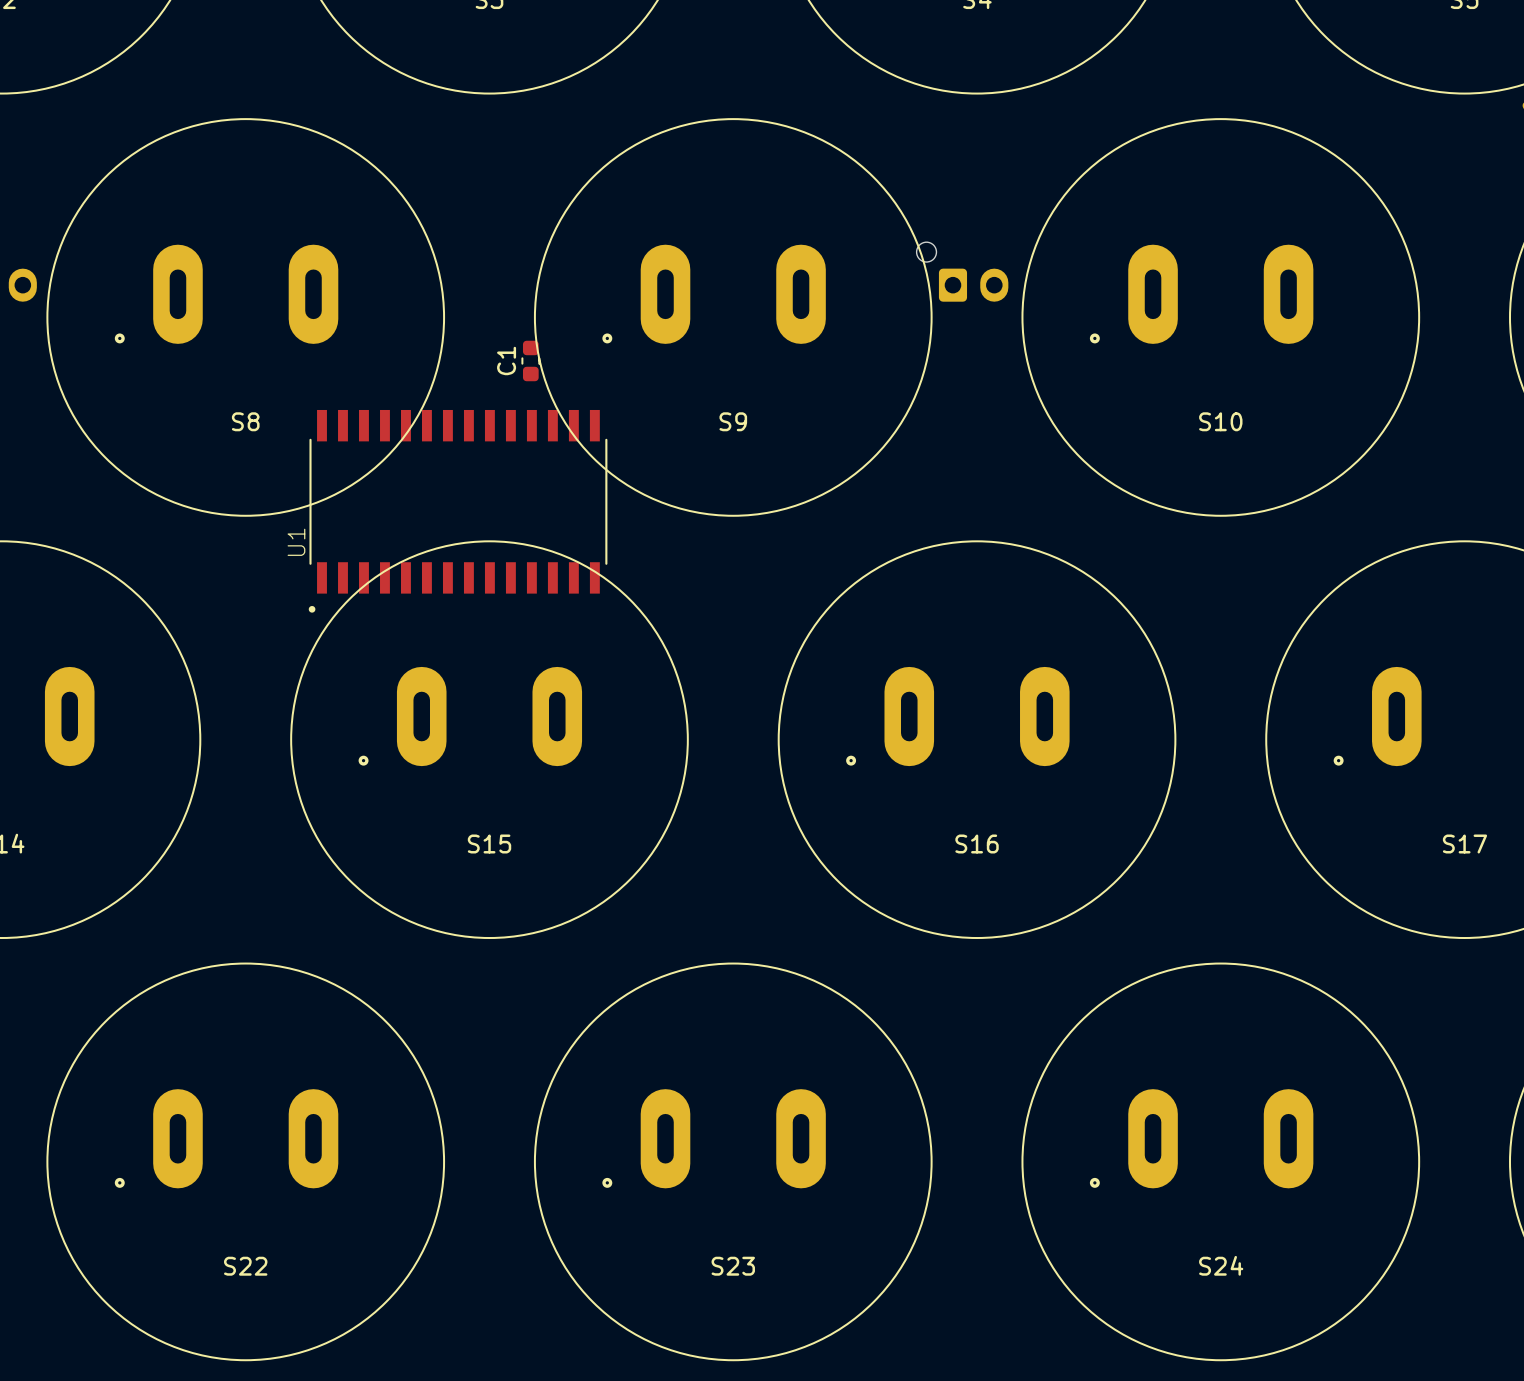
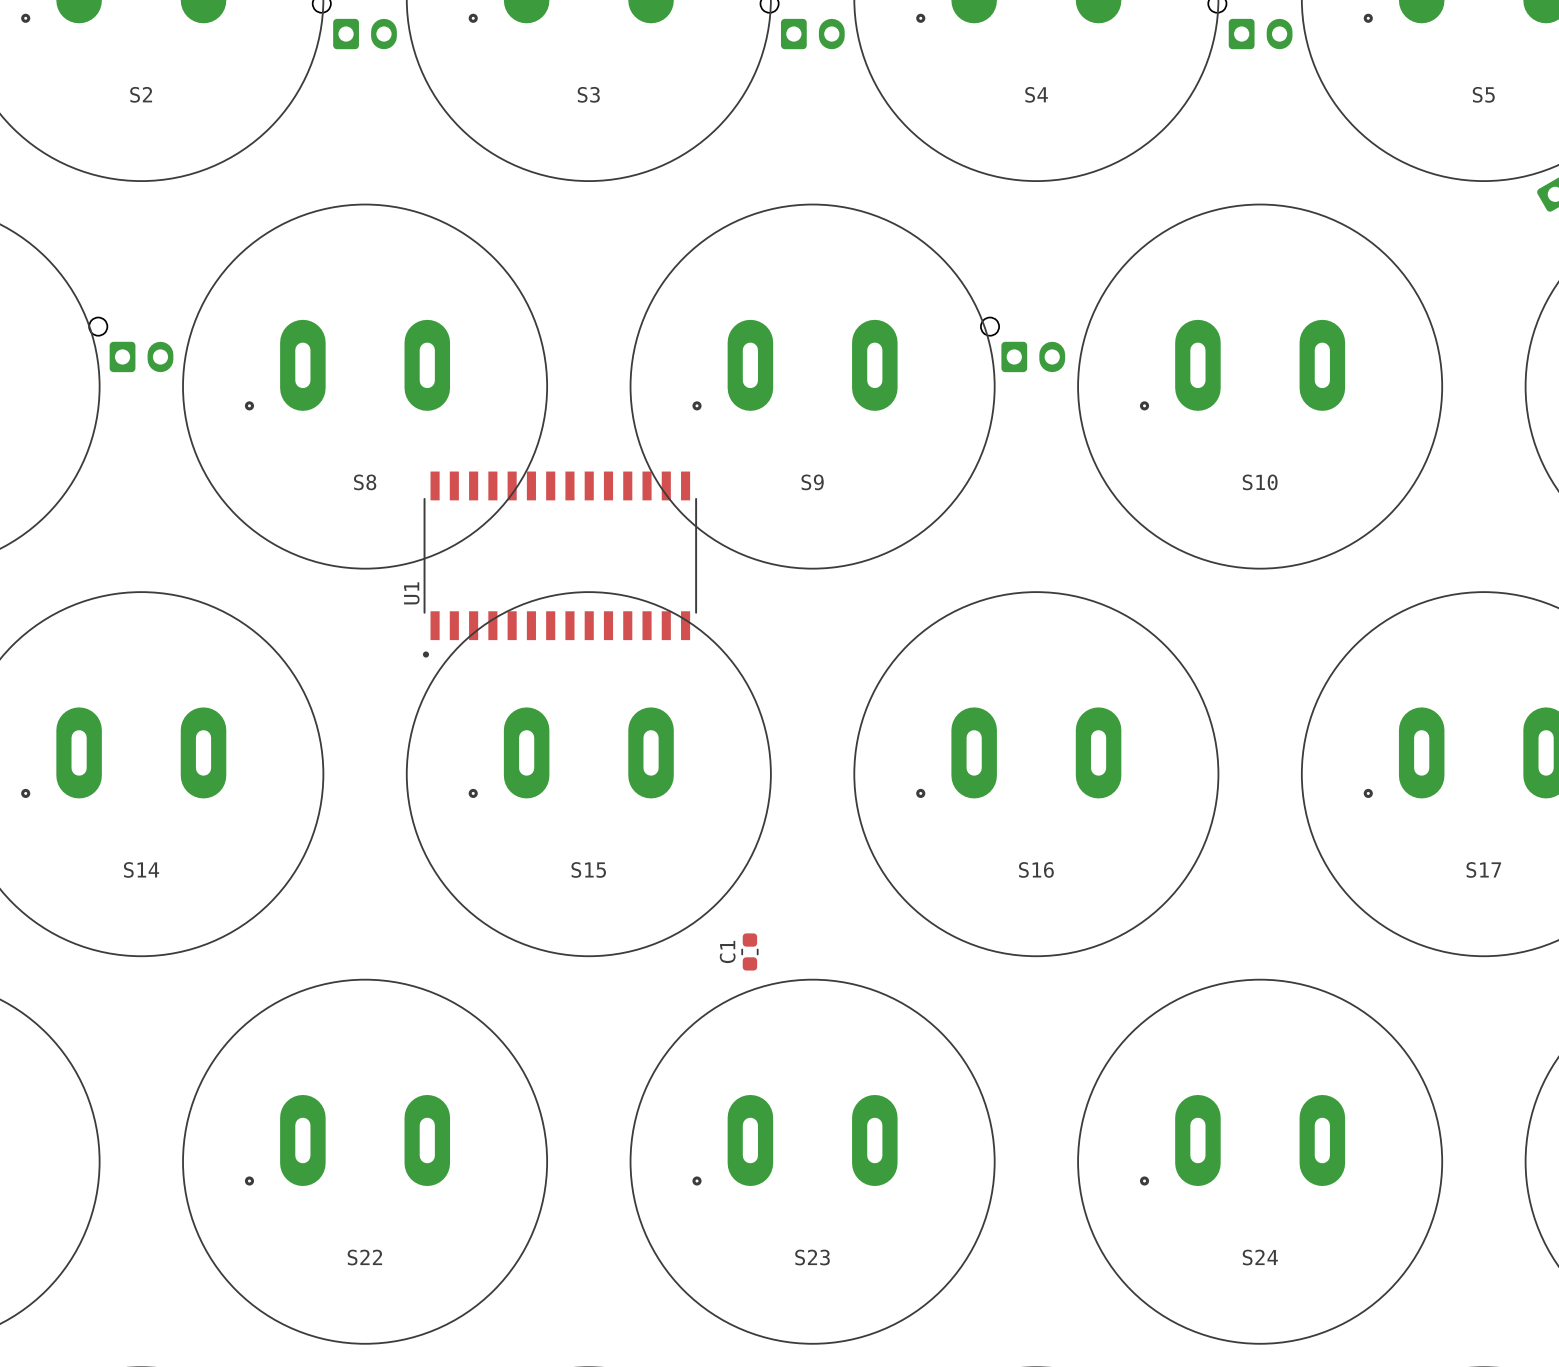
C1 position: (530, 360) -> (749, 951)

